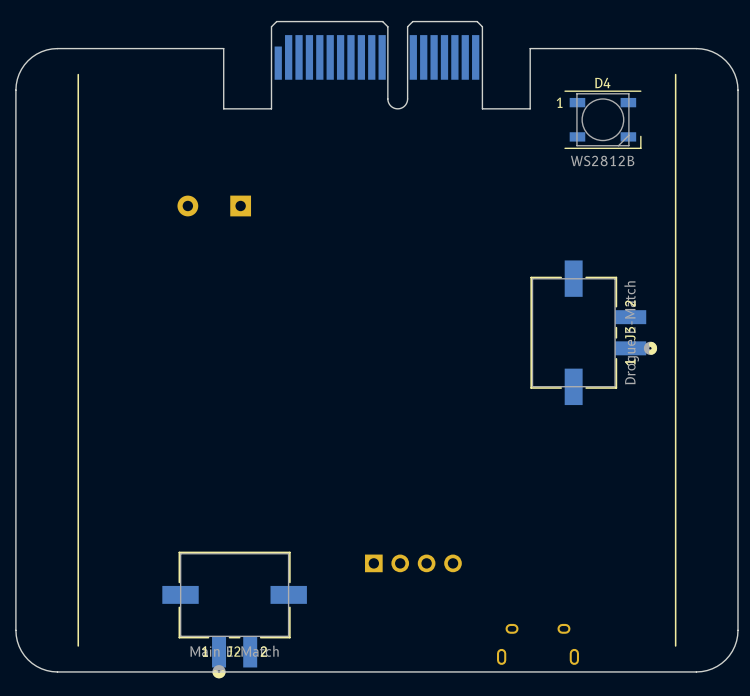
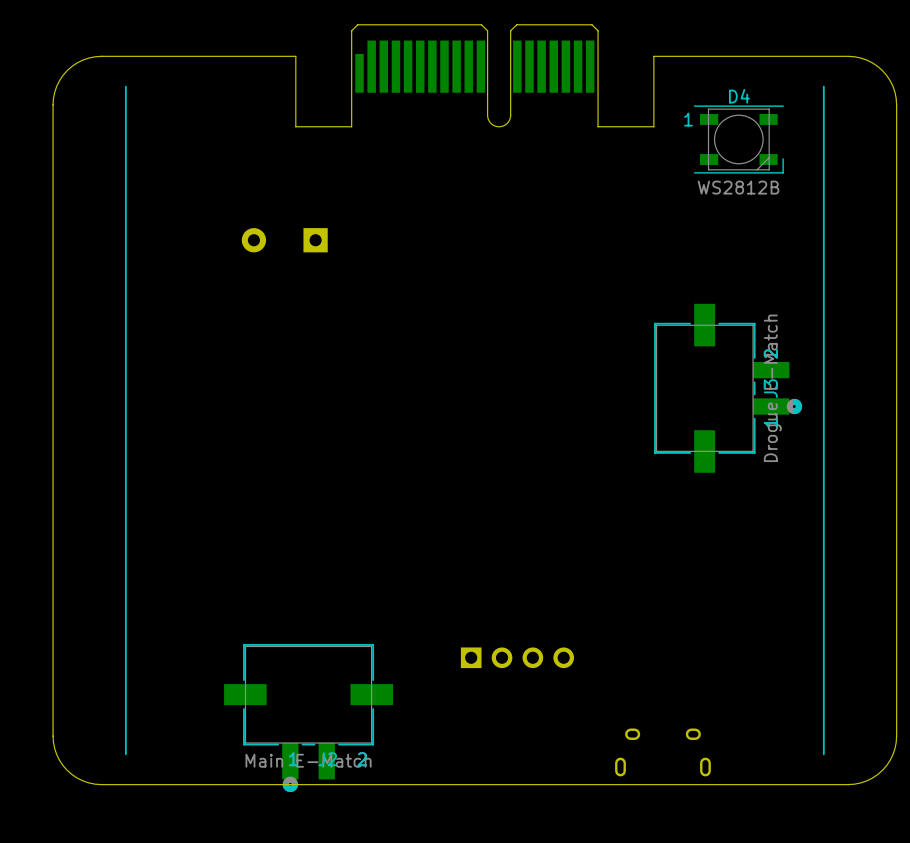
J2 footprint: [162, 551, 307, 679] -> [224, 644, 394, 793]

